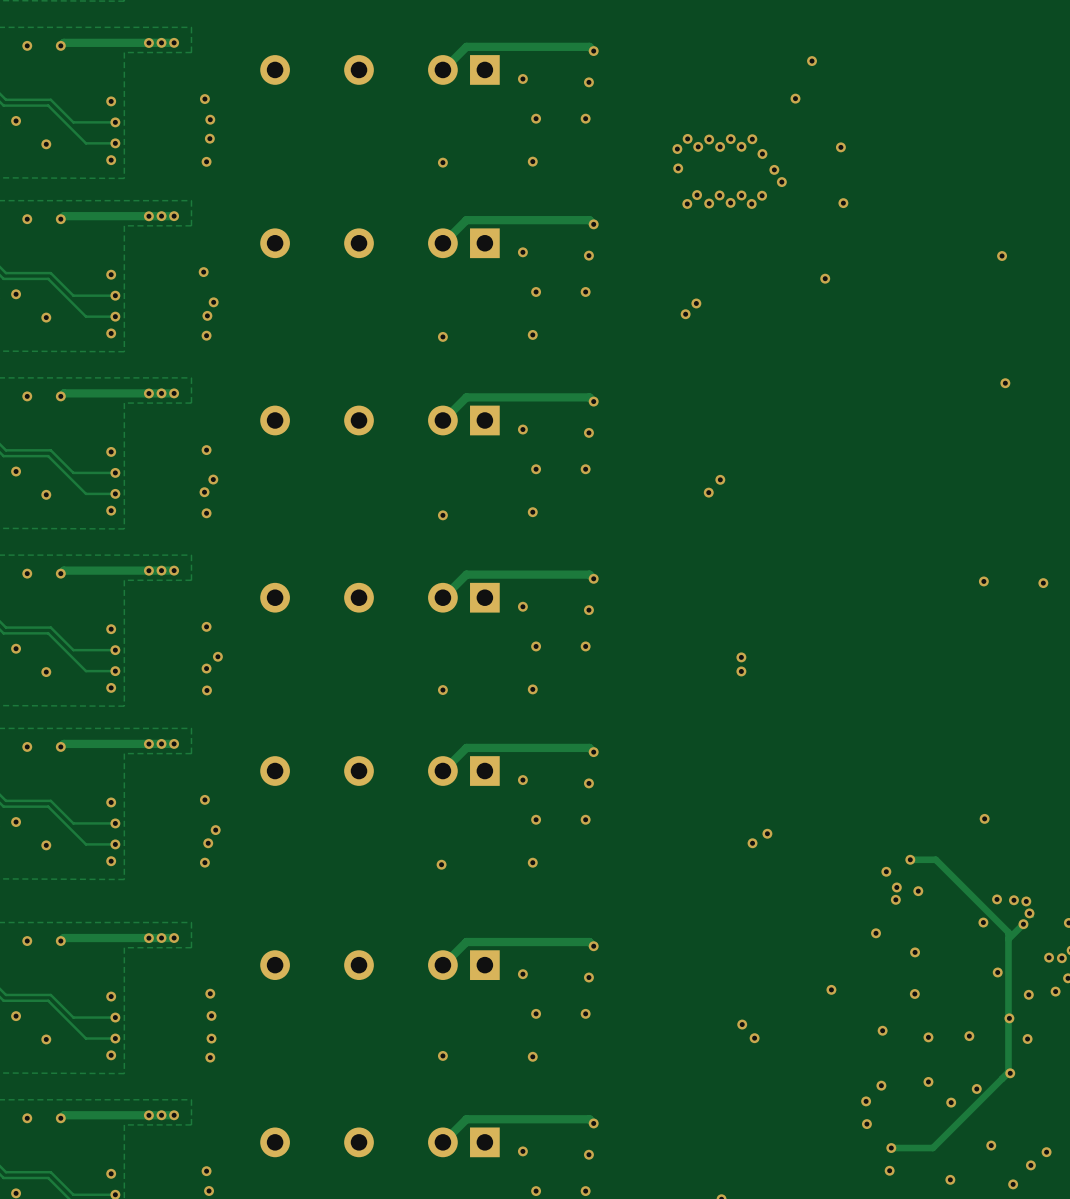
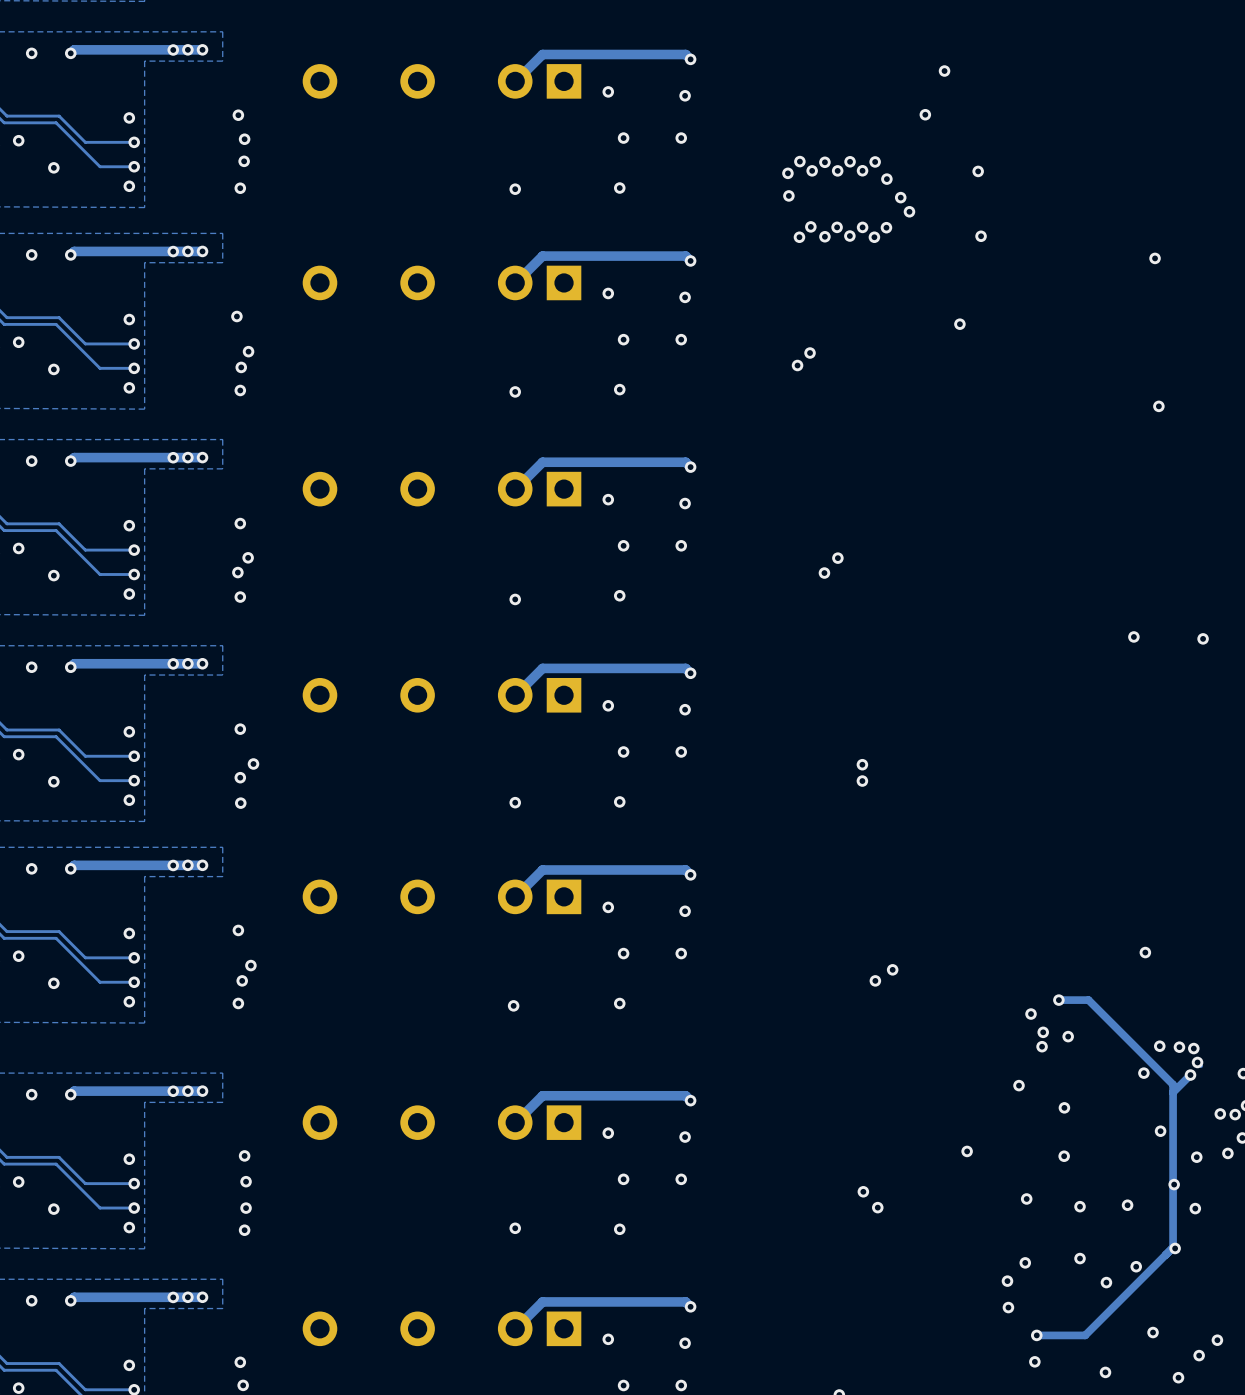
via position: (1002, 256) -> (1155, 258)
via position: (1005, 383) -> (1158, 406)
via: none -> (1133, 636)
via: none -> (1203, 638)
via: (983, 581) -> none
via: (1043, 583) -> none

